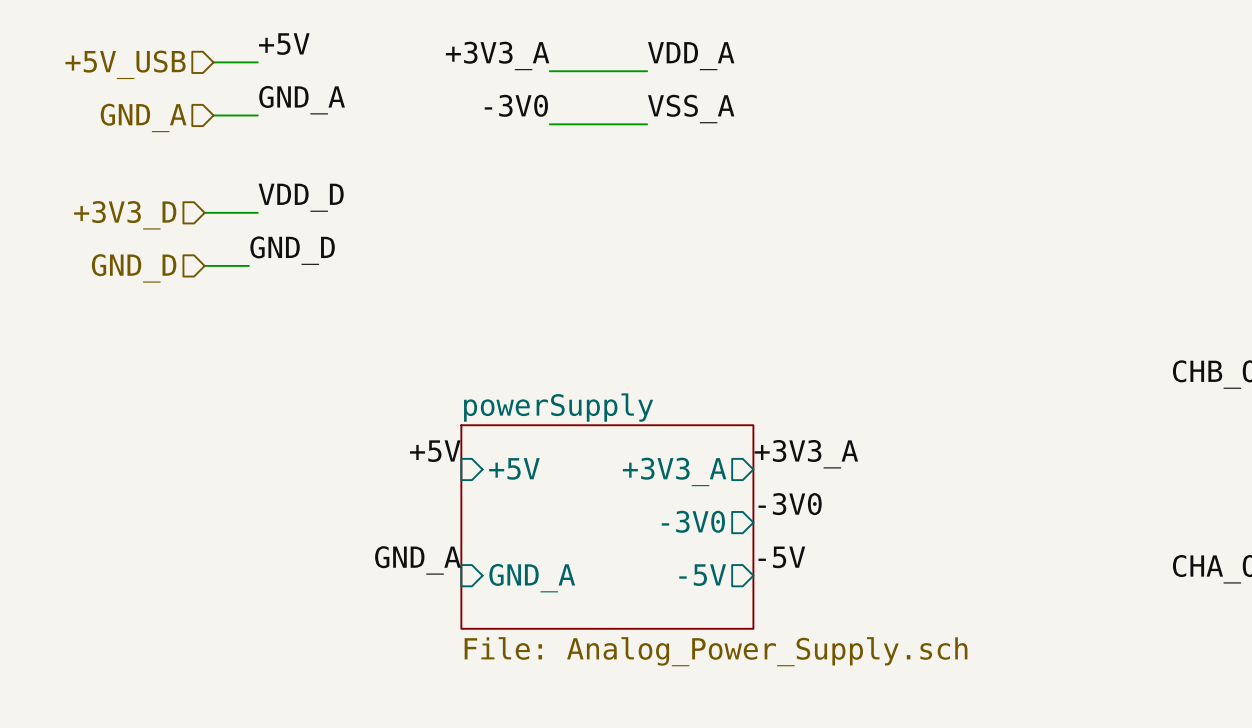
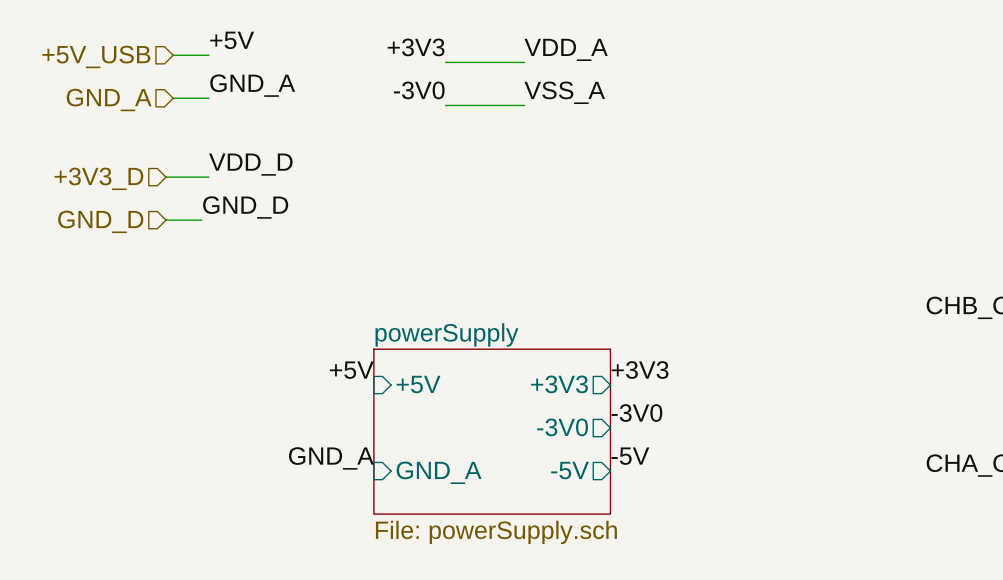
label: +3V3_A (497, 55) -> +3V3 (416, 47)
label: +3V3_A (806, 454) -> +3V3 (640, 370)
sheet pin: +3V3_A (674, 471) -> +3V3 (559, 384)
sheet powerSupply value: File: Analog_Power_Supply.sch (716, 651) -> File: powerSupply.sch (496, 532)

